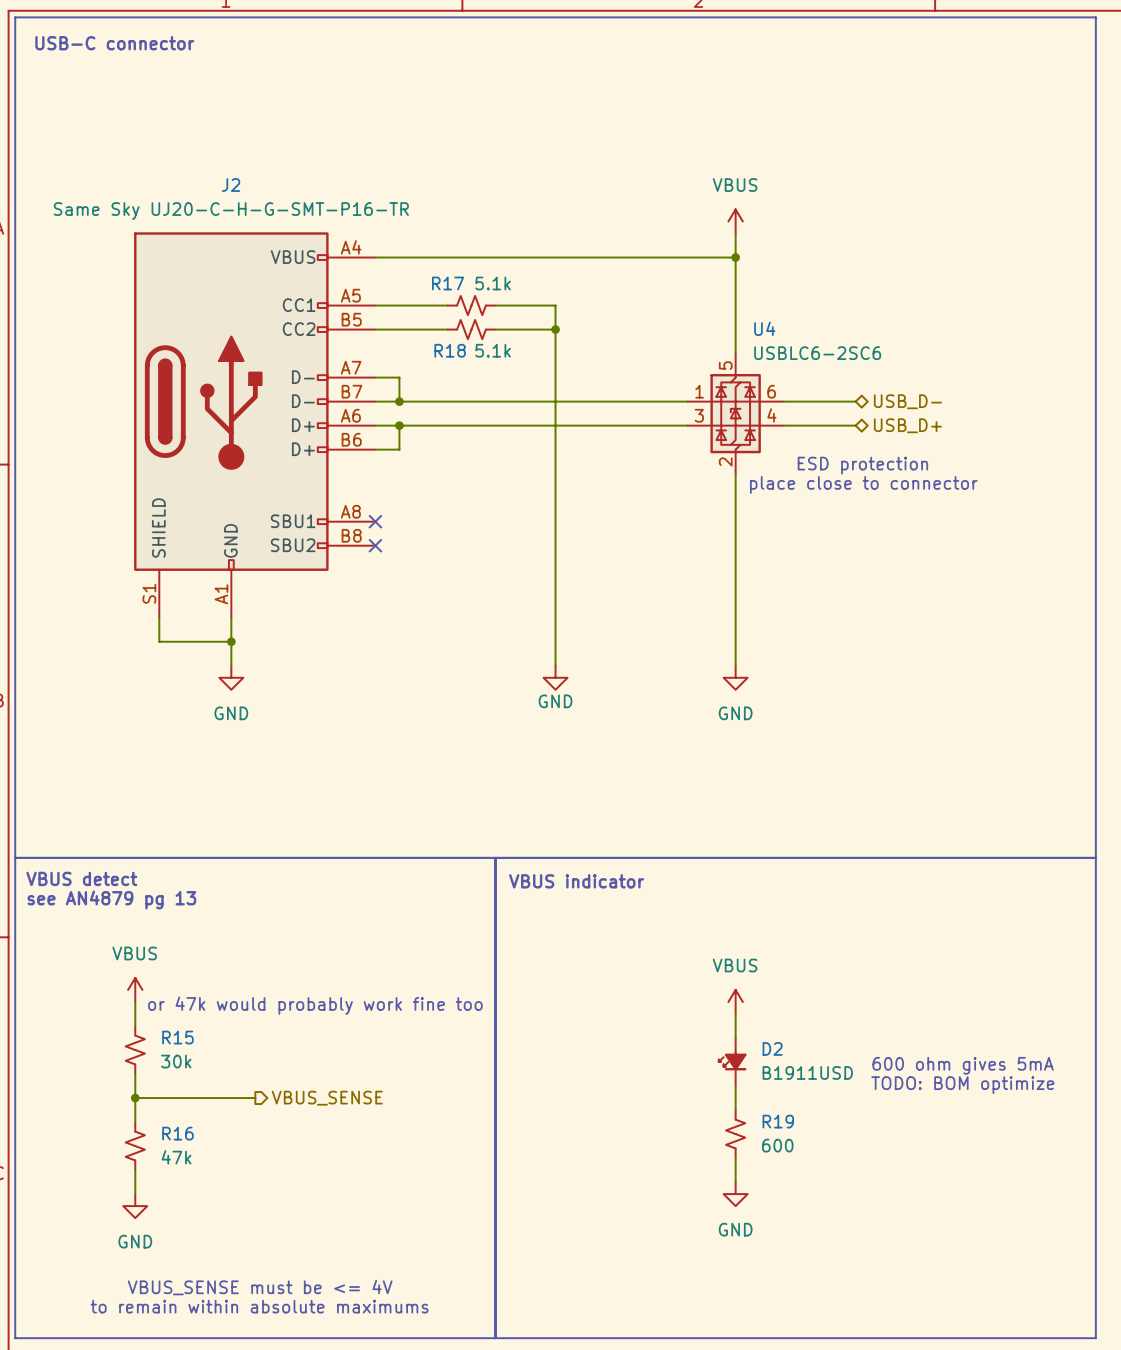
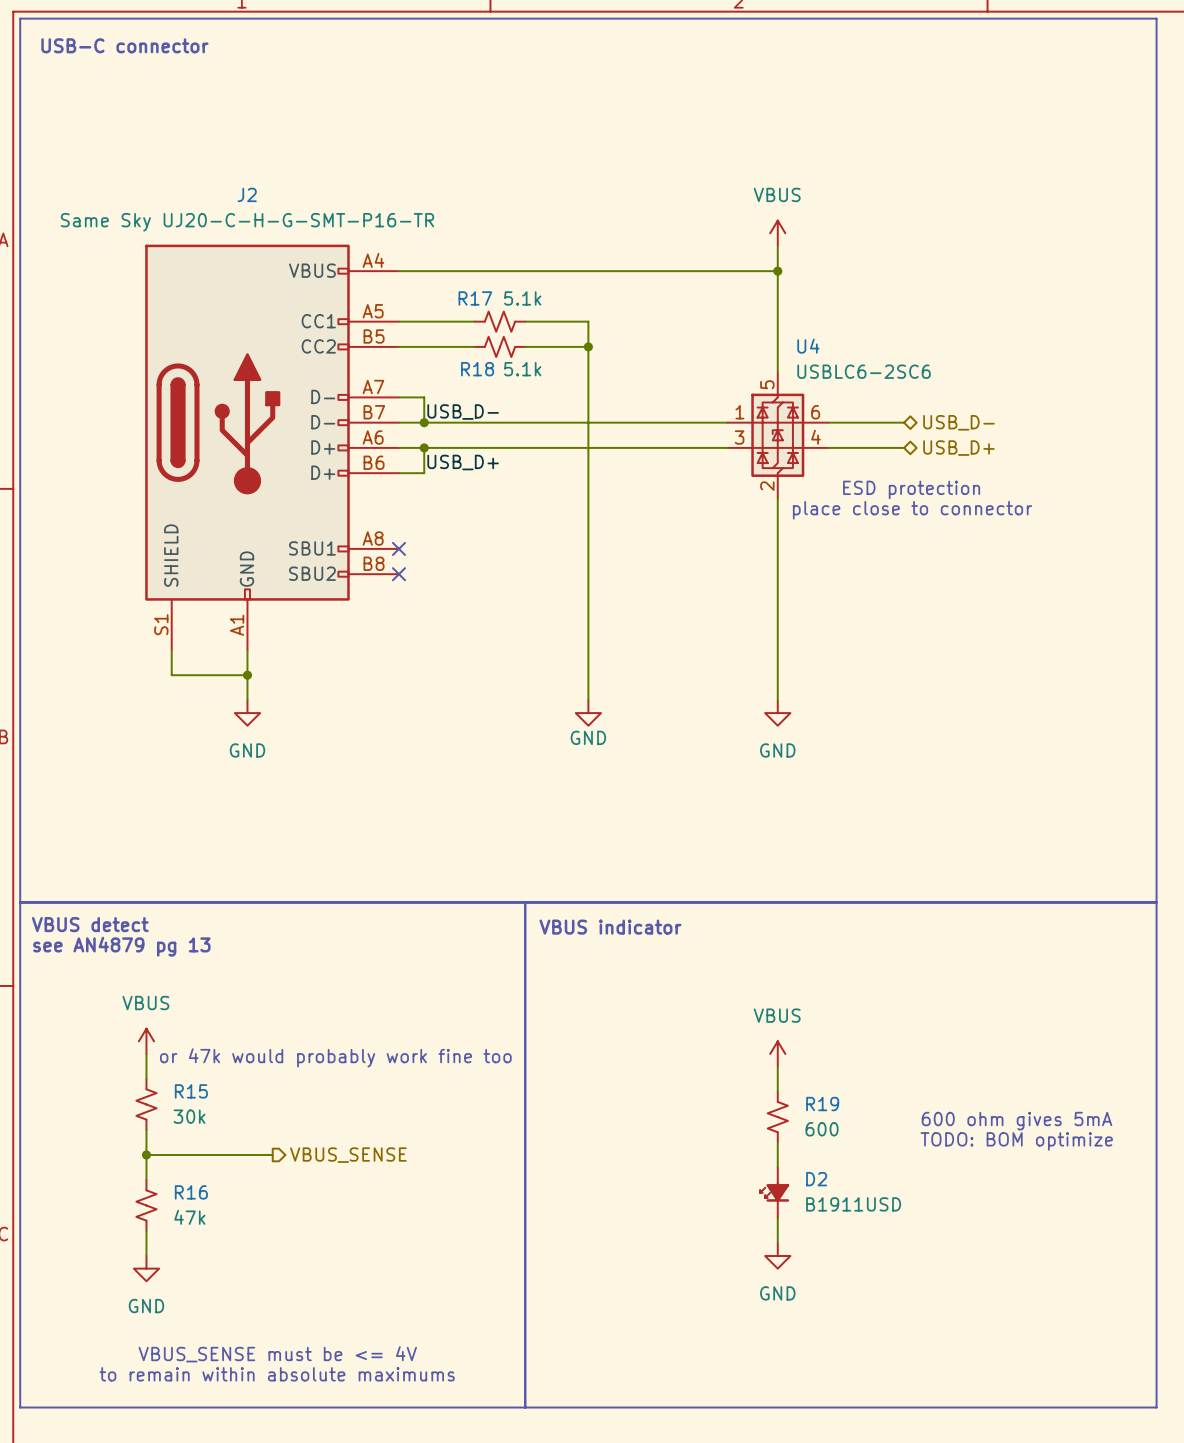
label: none -> USB_D- (463, 412)
label: none -> USB_D+ (463, 462)
D2 position: (732, 1062) -> (774, 1192)
R19 position: (735, 1134) -> (777, 1117)

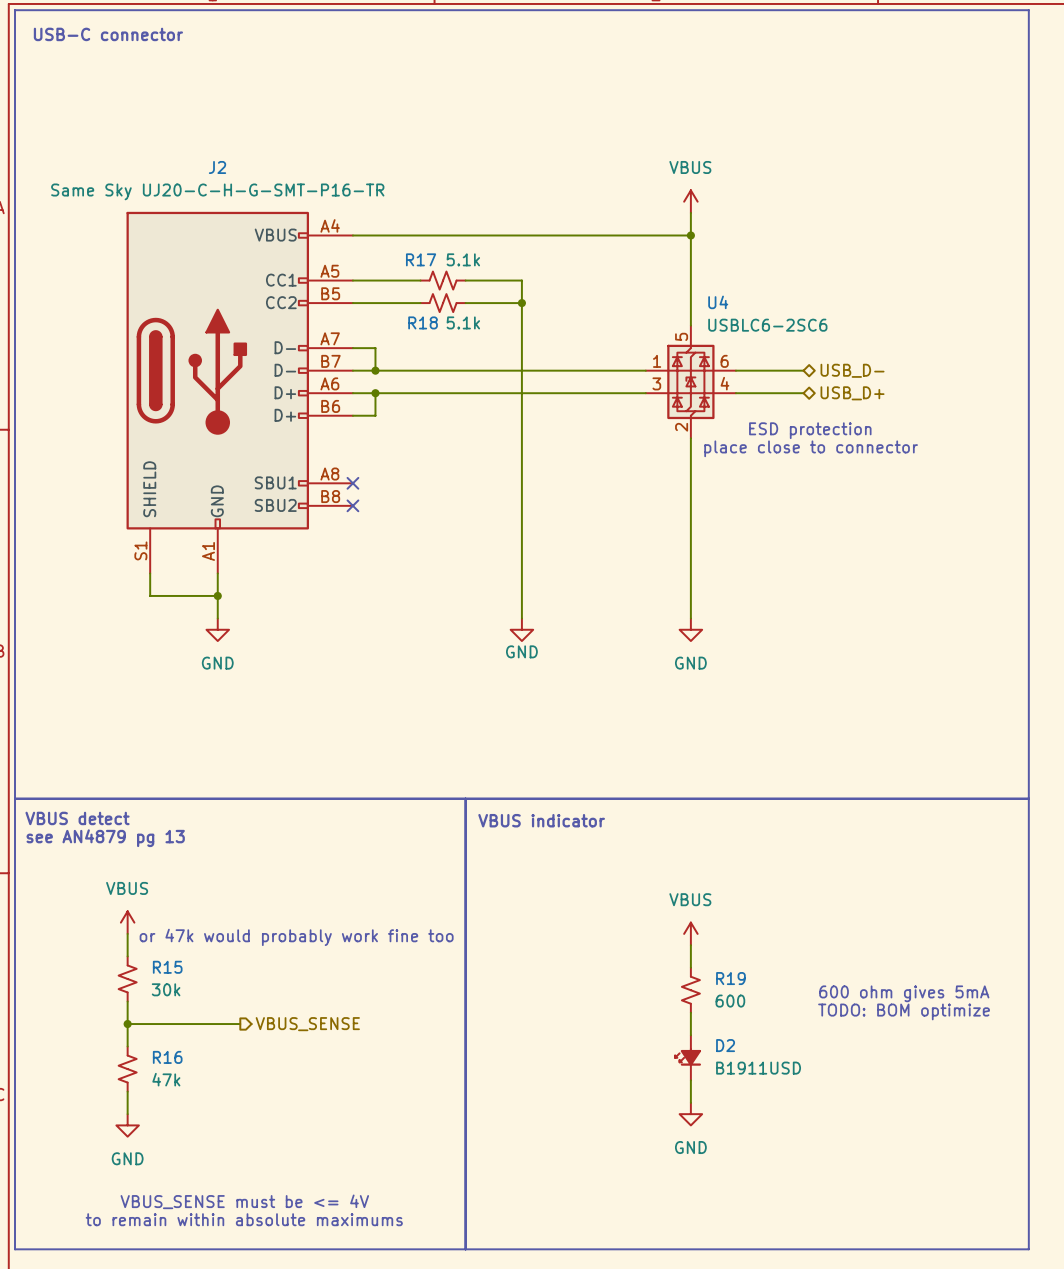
label: USB_D- (463, 412) -> none
label: USB_D+ (463, 462) -> none

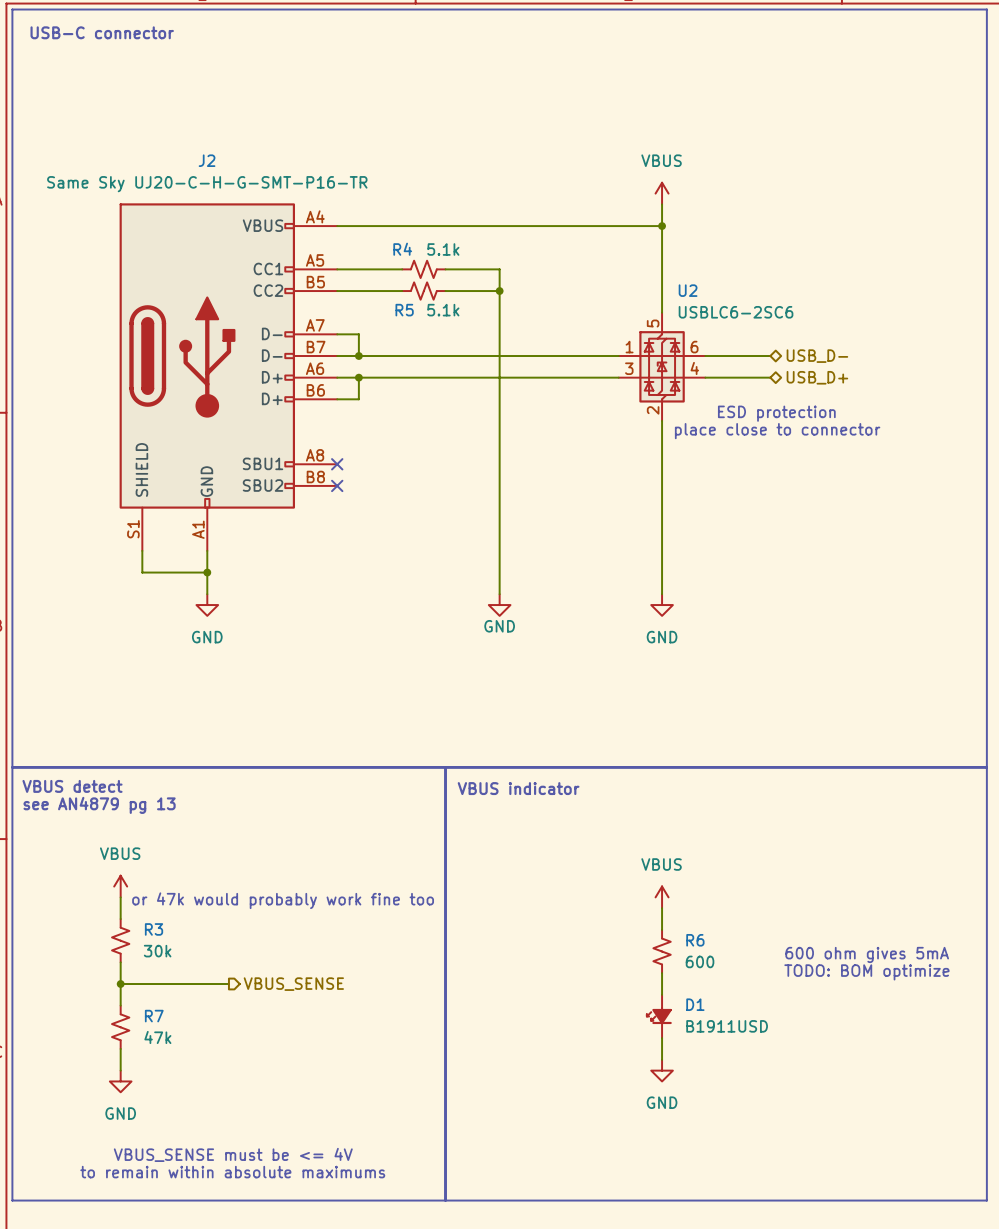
R17 name: R17 (421, 259) -> R4 (402, 249)
U4 name: U4 (718, 302) -> U2 (688, 290)
R18 name: R18 (423, 322) -> R5 (404, 310)
R15 name: R15 (167, 967) -> R3 (154, 929)
R19 name: R19 (730, 978) -> R6 (695, 940)
D2 name: D2 (725, 1045) -> D1 (695, 1004)
R16 name: R16 (167, 1057) -> R7 (154, 1016)

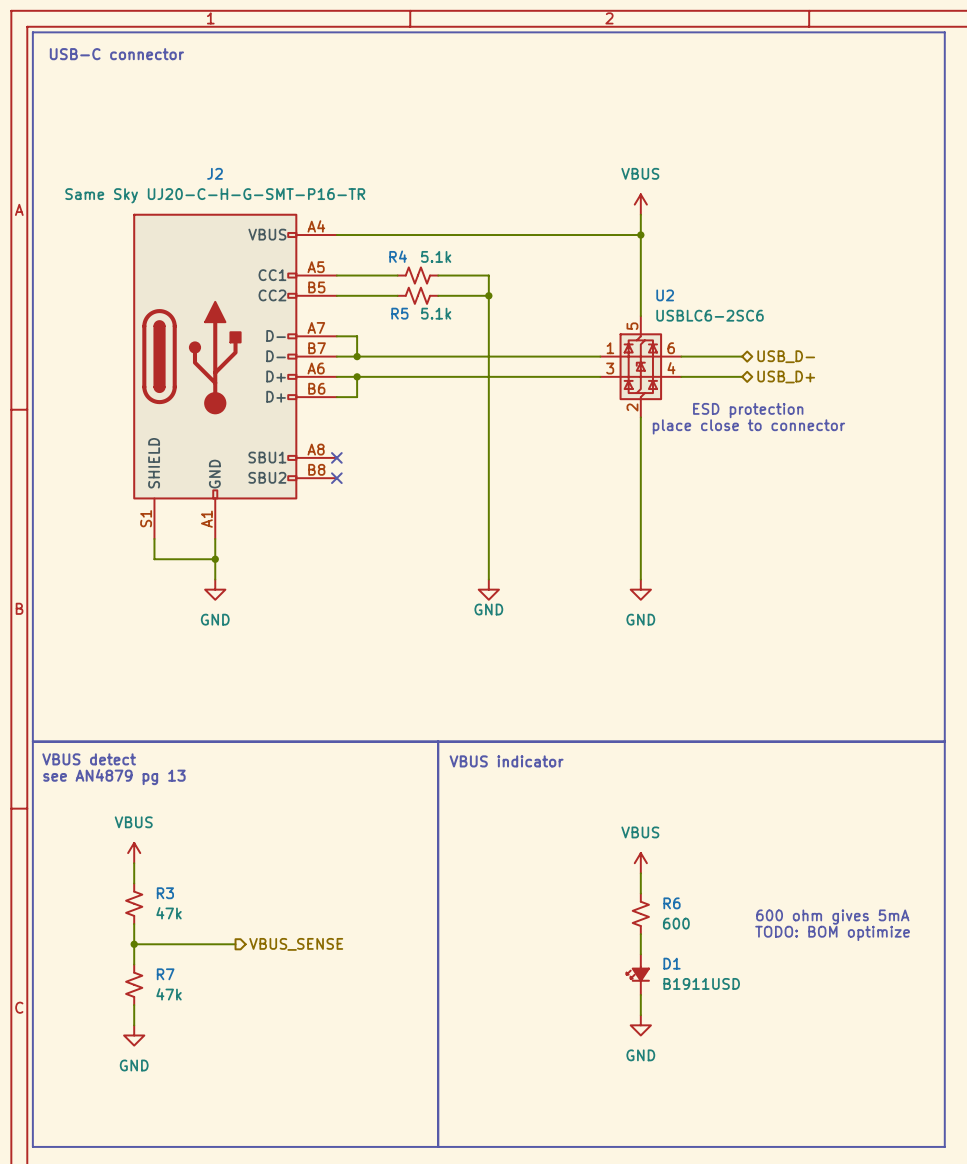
text: or 47k would probably work fine too (283, 900) -> none
R3 value: 30k (157, 951) -> 47k (169, 913)
text: VBUS_SENSE must be <= 4V (233, 1154) -> none
text: to remain within absolute maximums (232, 1172) -> none

